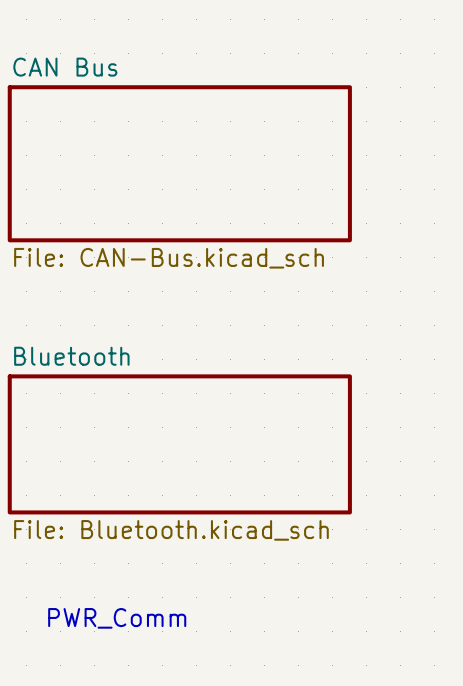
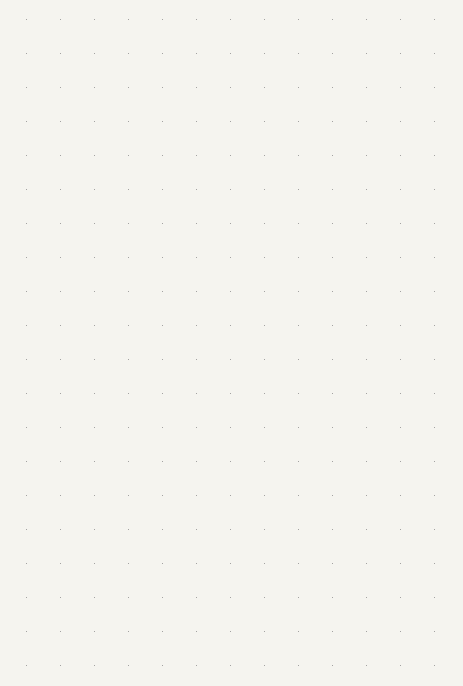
sheet CAN Bus: File: CAN-Bus.kicad_sch (179, 163) -> none
sheet Bluetooth: File: Bluetooth.kicad_sch (179, 444) -> none
text: PWR_Comm (117, 618) -> none

